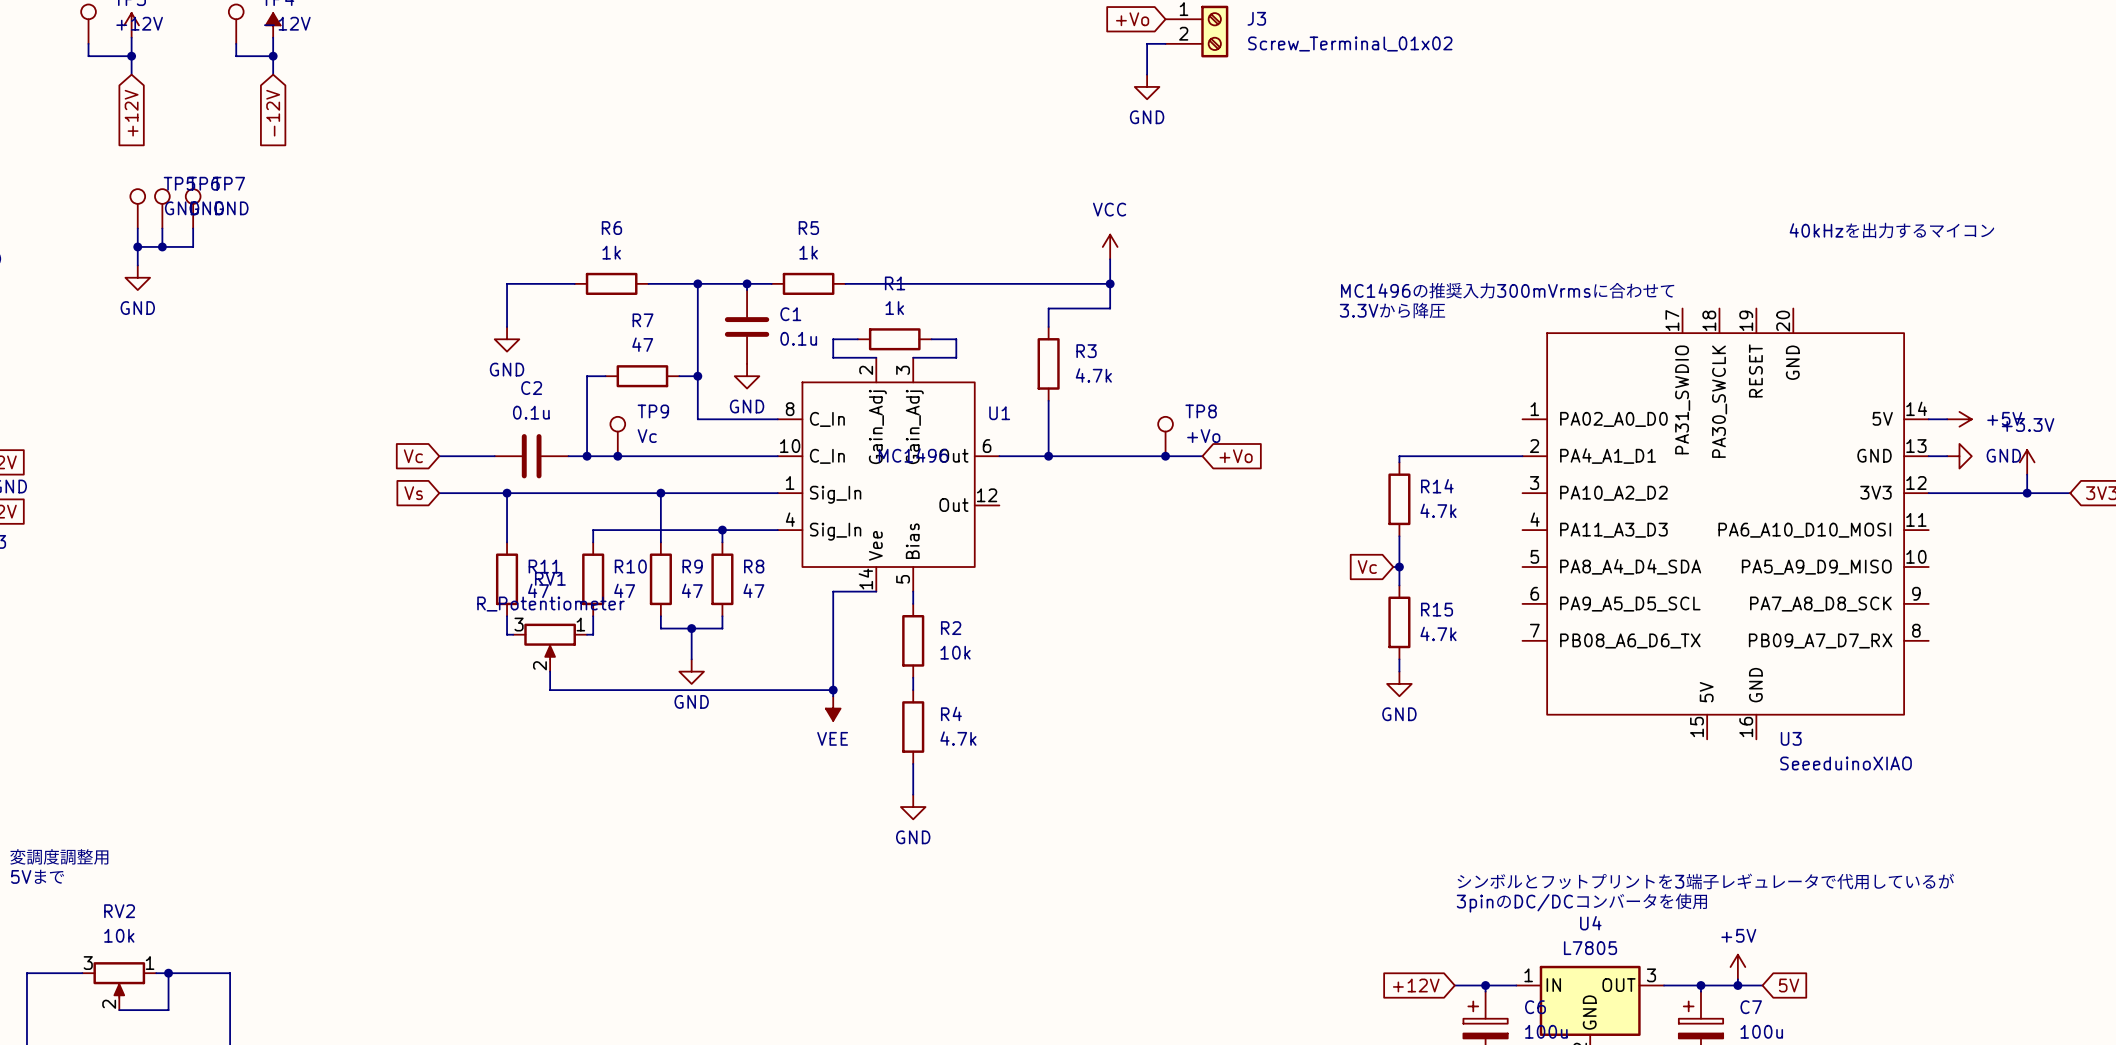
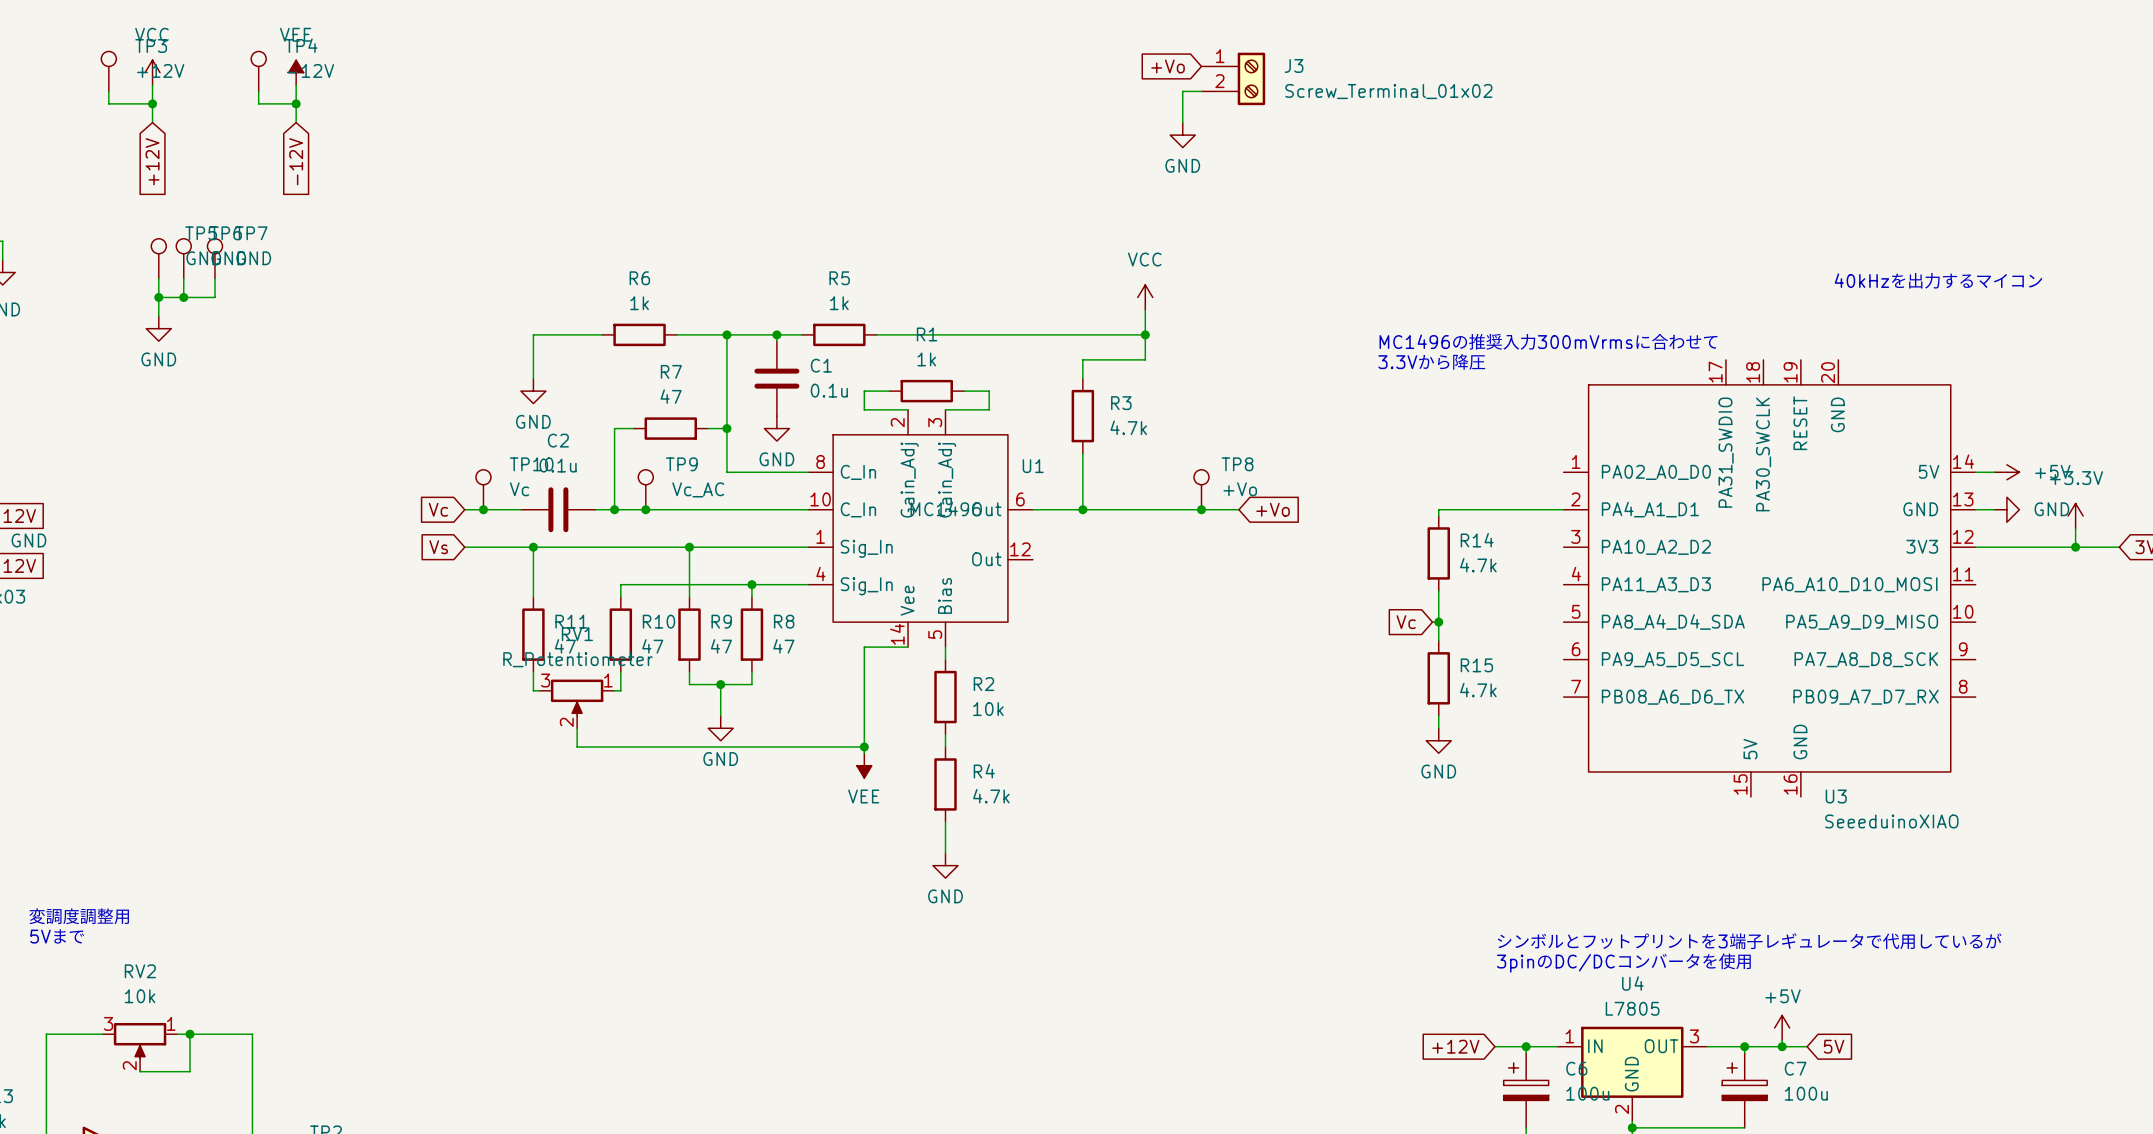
TP10: none -> Vc (483, 489)
TP9 value: Vc (647, 436) -> Vc_AC (698, 489)
junction: none -> (483, 509)

